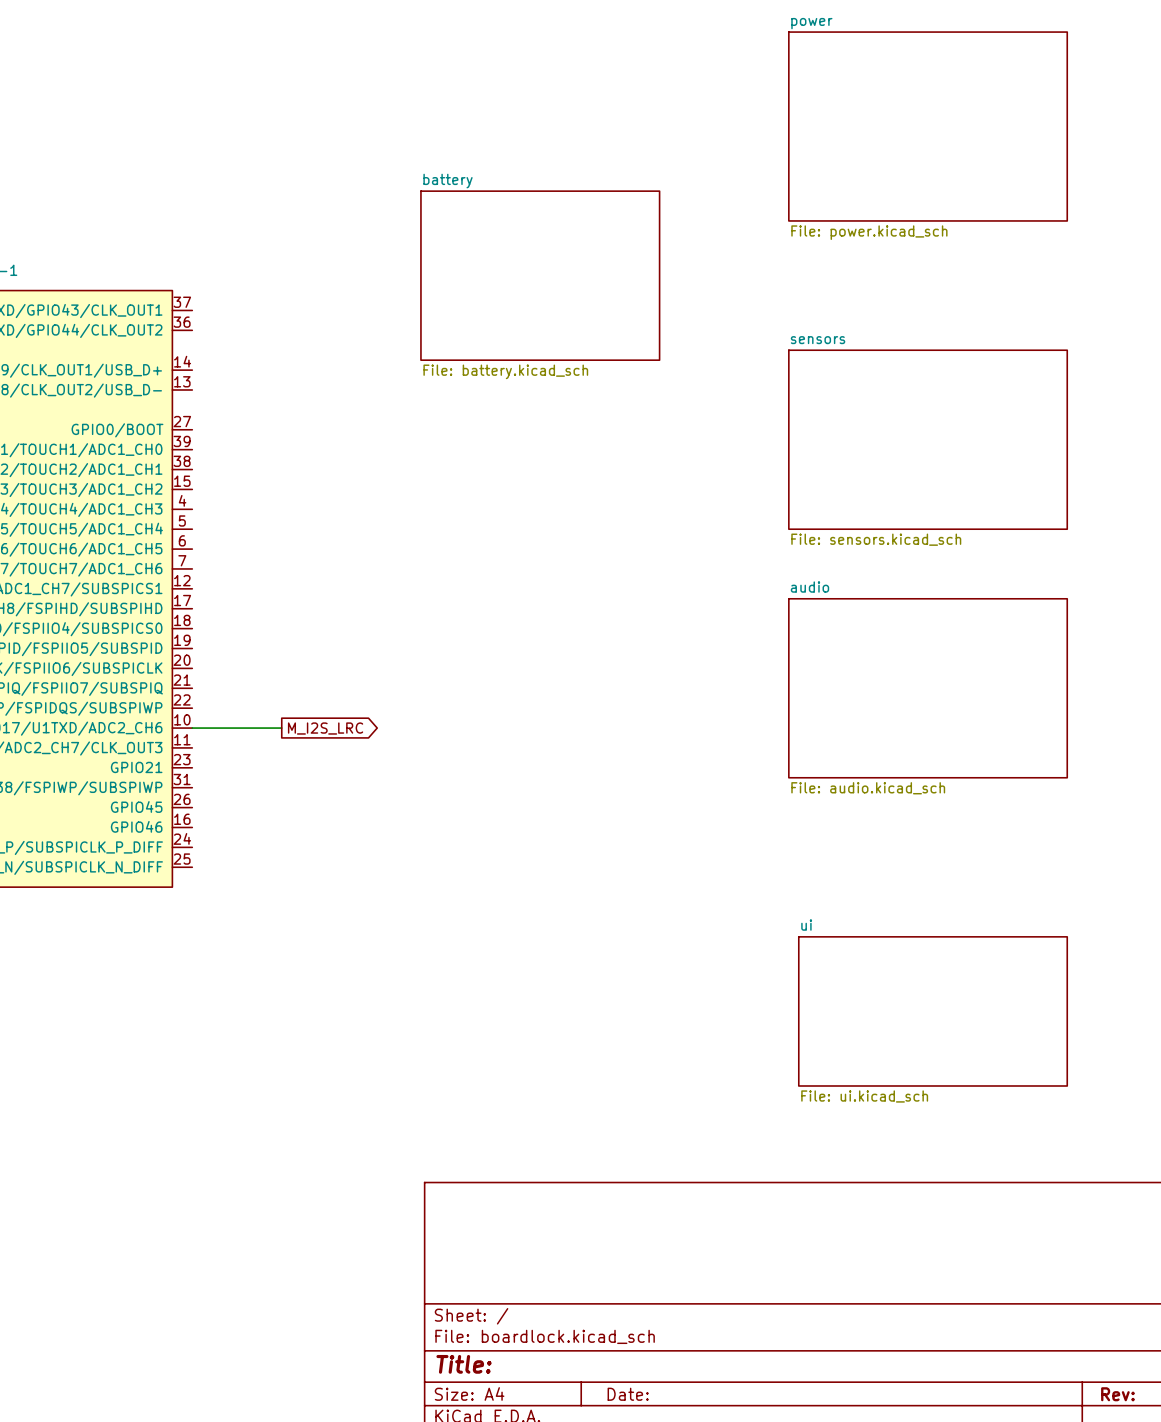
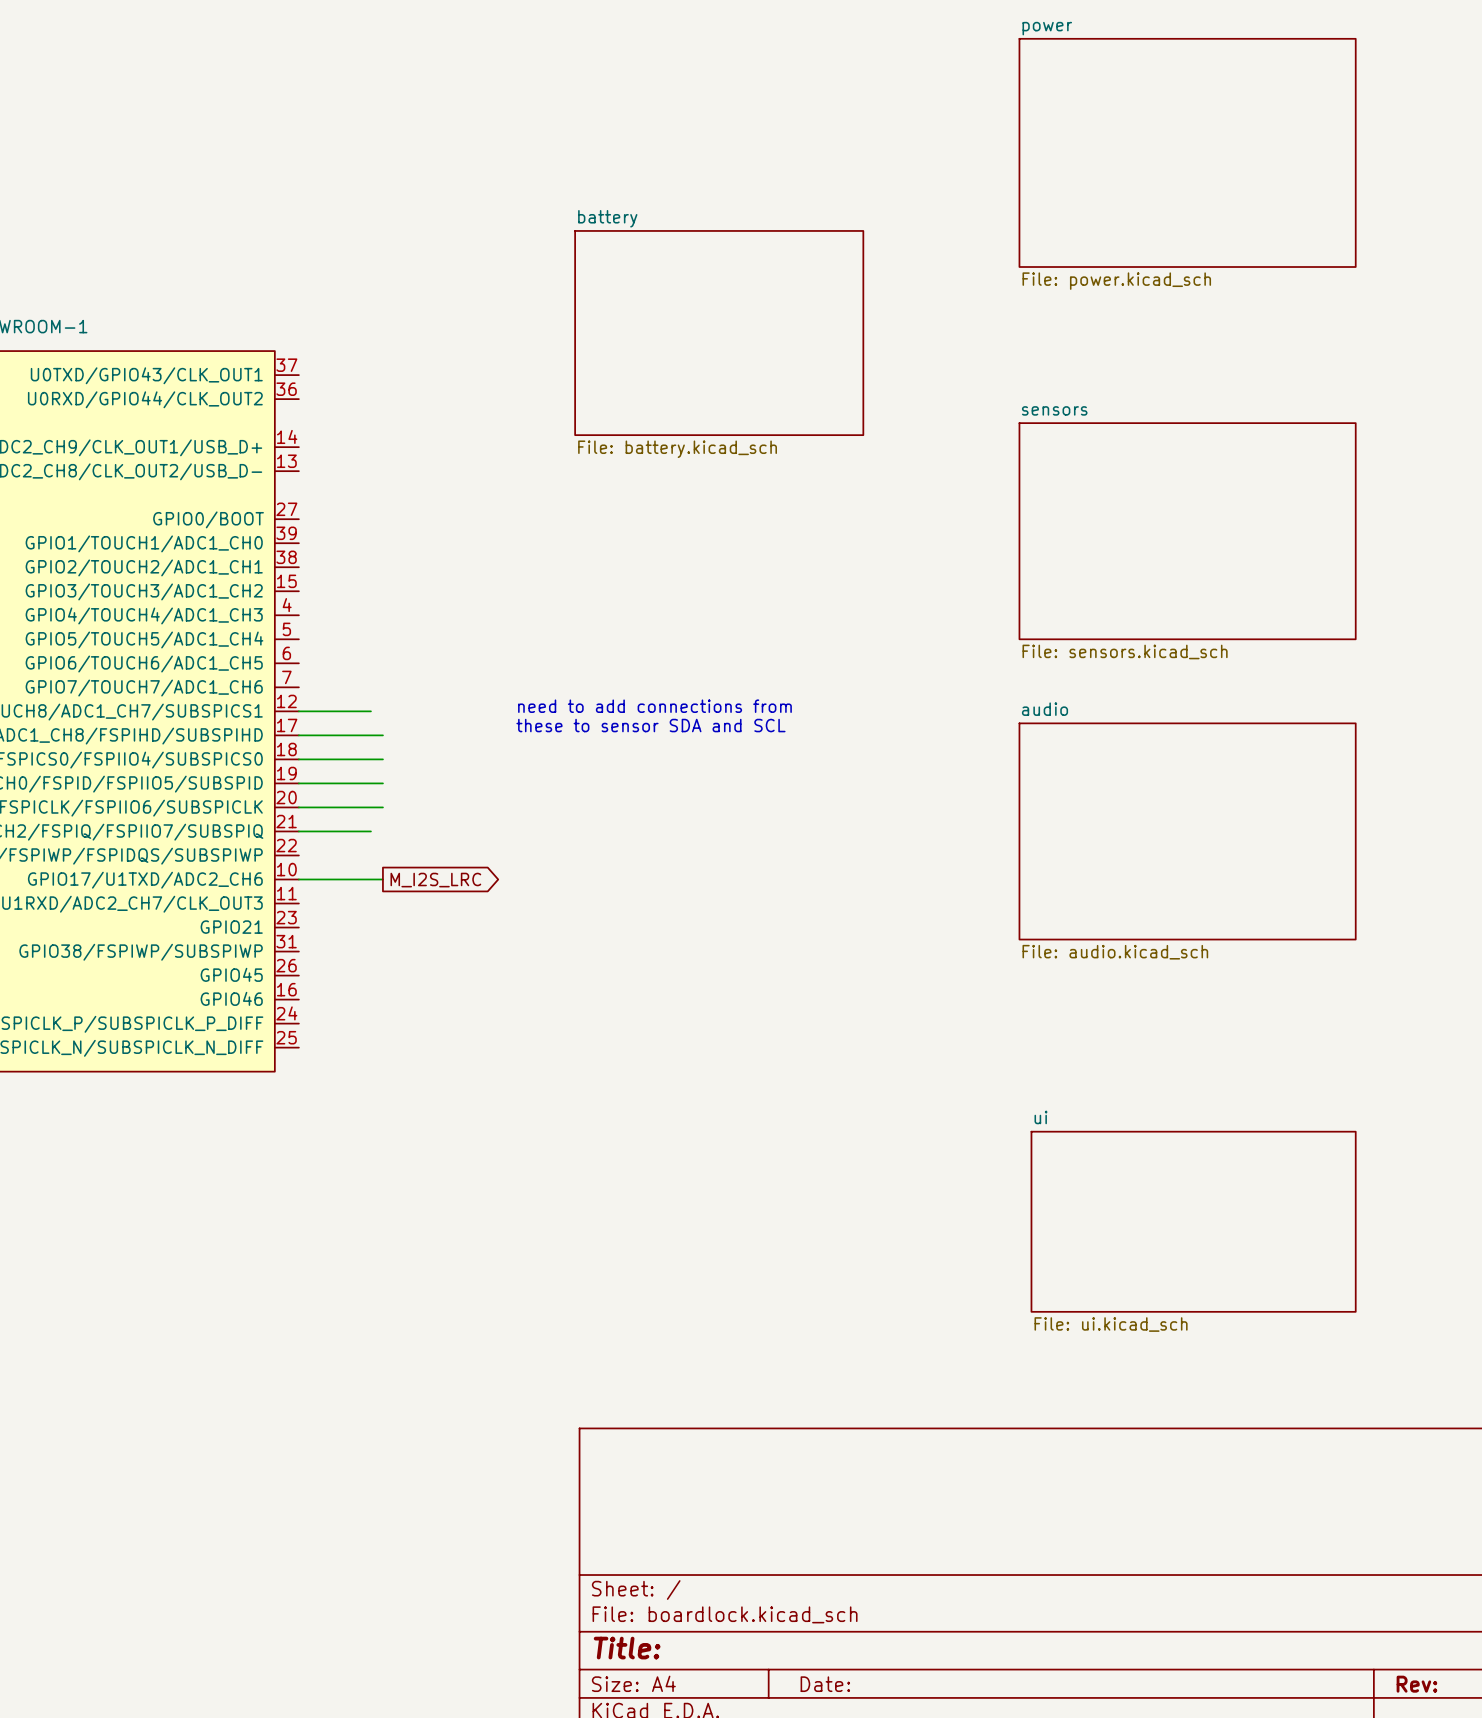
text: none -> need to add connections from (654, 706)
wire: none -> (298, 711) (370, 711)
text: none -> these to sensor SDA and SCL (650, 725)
wire: none -> (298, 735) (382, 735)
wire: none -> (298, 759) (382, 759)
wire: none -> (298, 783) (382, 783)
wire: none -> (298, 807) (382, 807)
wire: none -> (298, 831) (370, 831)
wire: (261, 728) (281, 728) -> none
global label position: M_I2S_LRC (325, 728) -> M_I2S_LRC (435, 880)

